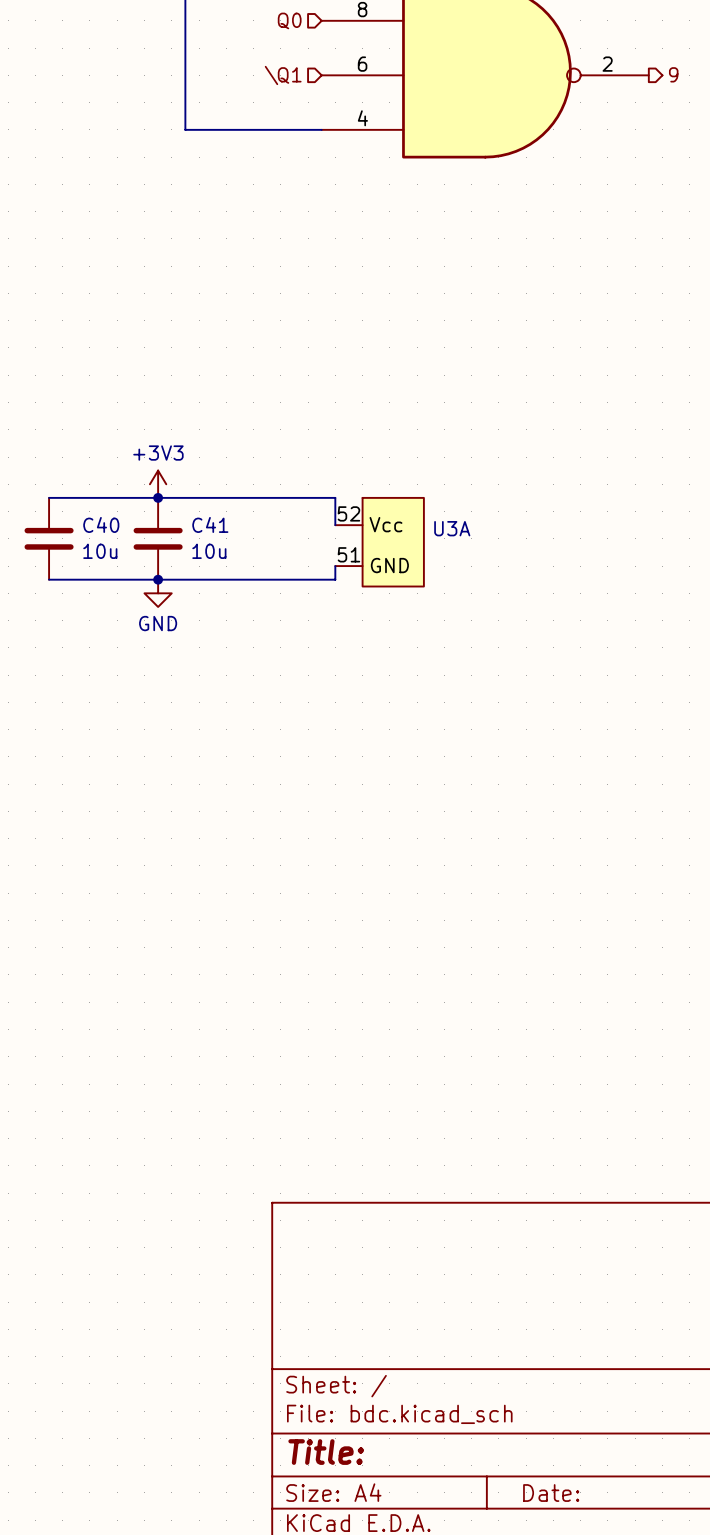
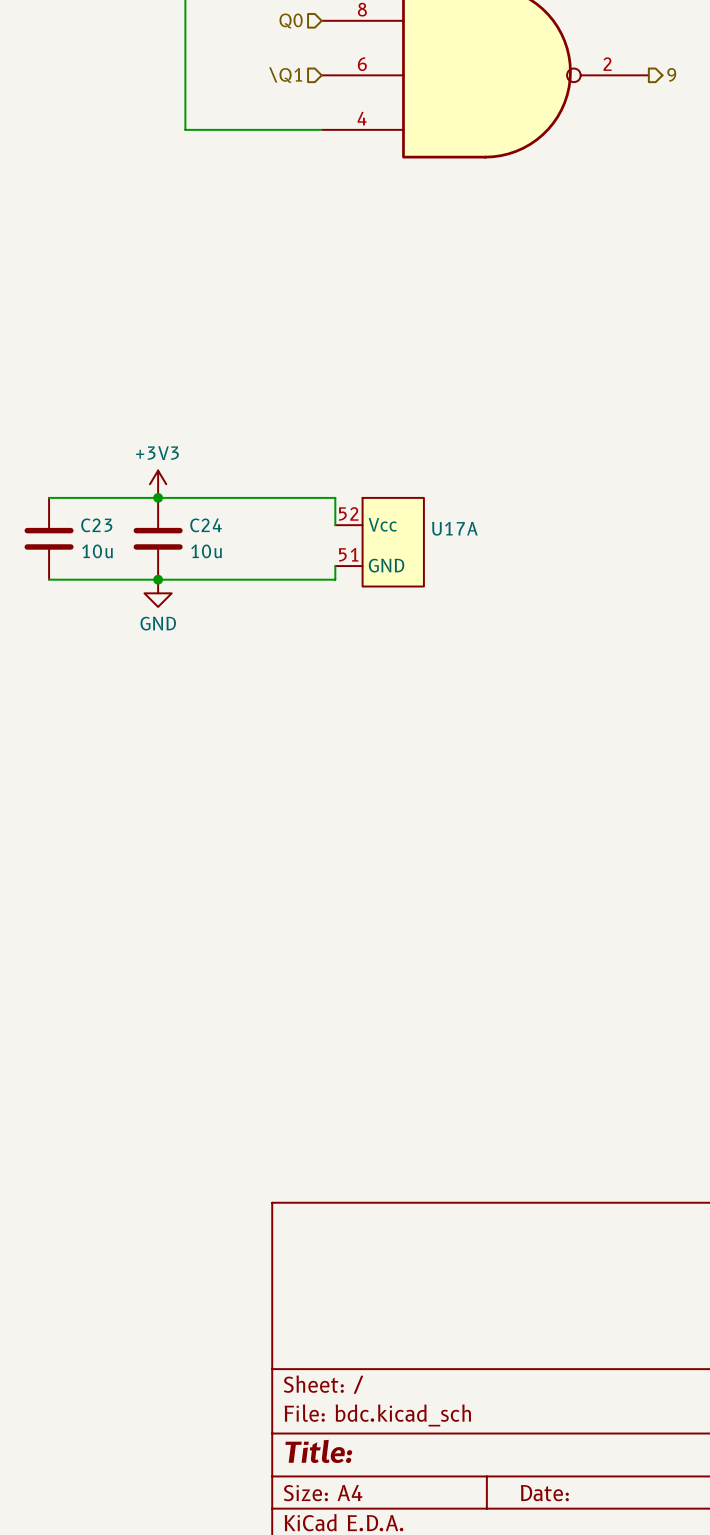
C40 name: C40 (101, 524) -> C23 (96, 525)
C41 name: C41 (210, 524) -> C24 (206, 525)
U3A name: U3A (452, 528) -> U17A (454, 528)

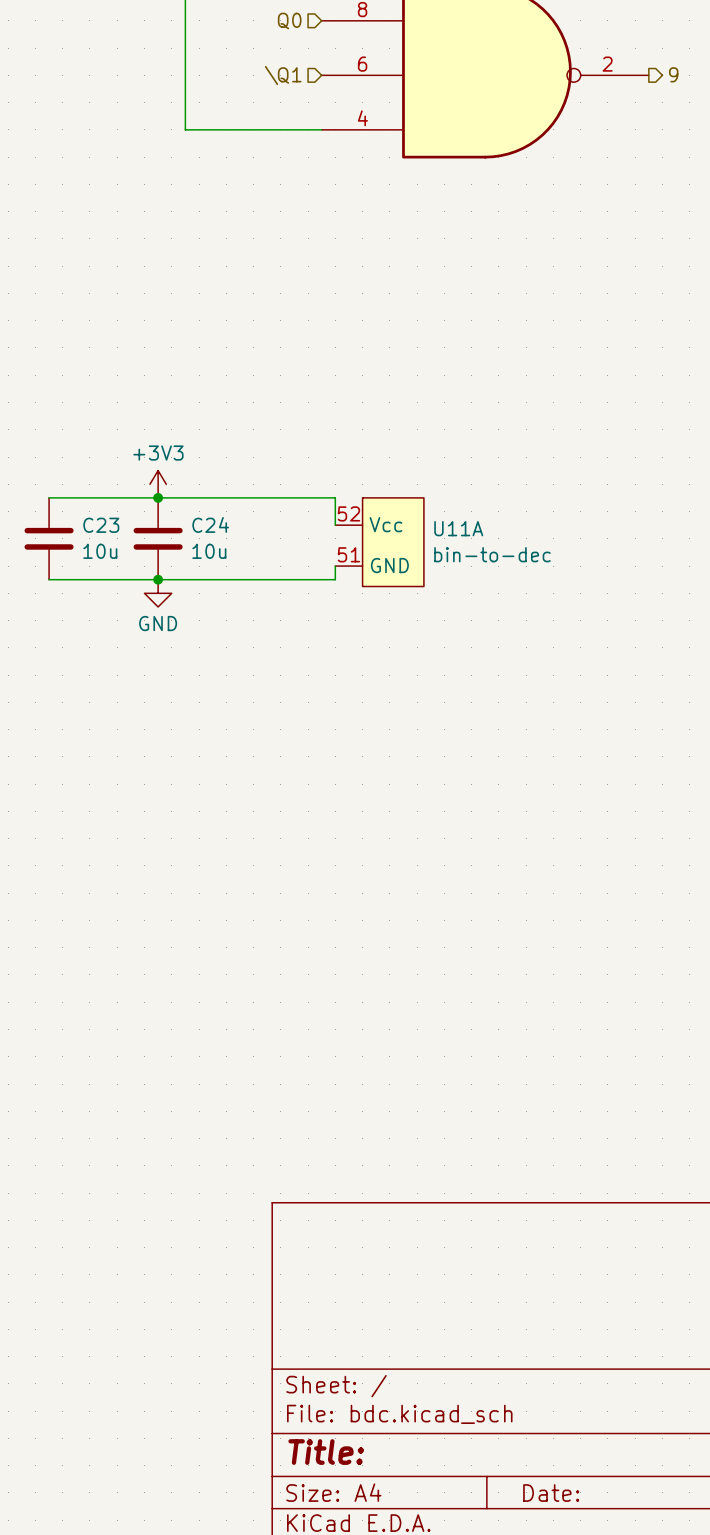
U17A name: U17A (454, 528) -> U11A (458, 528)
U17A value: none -> bin-to-dec (492, 554)

